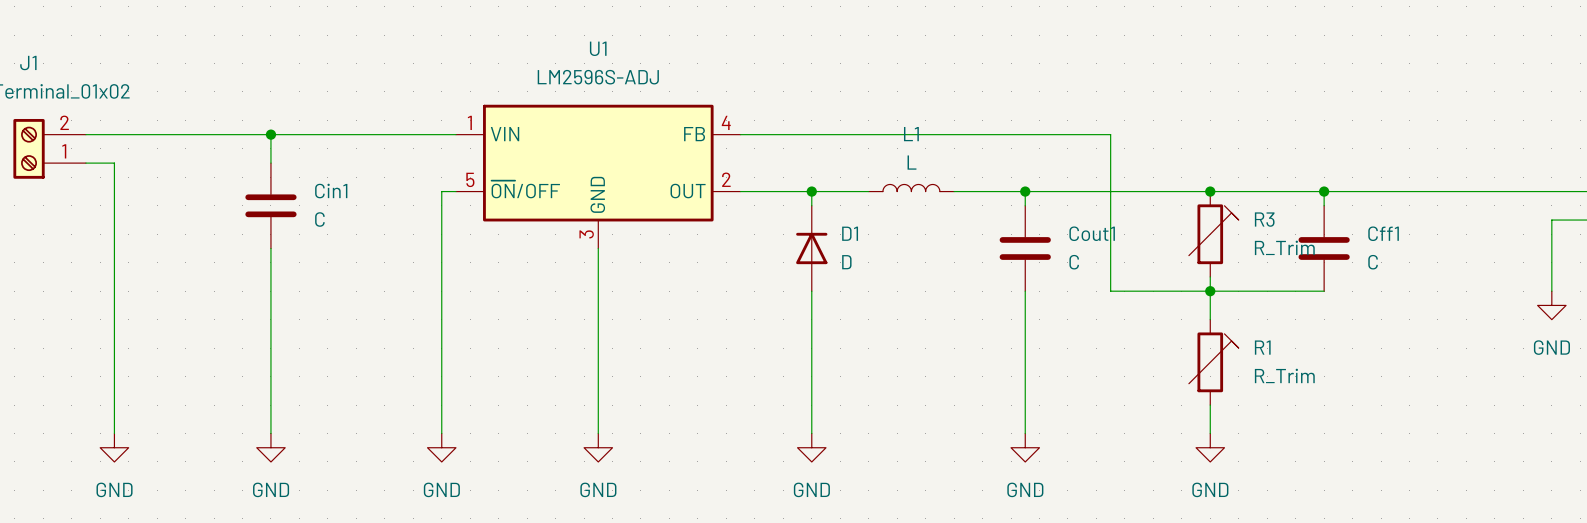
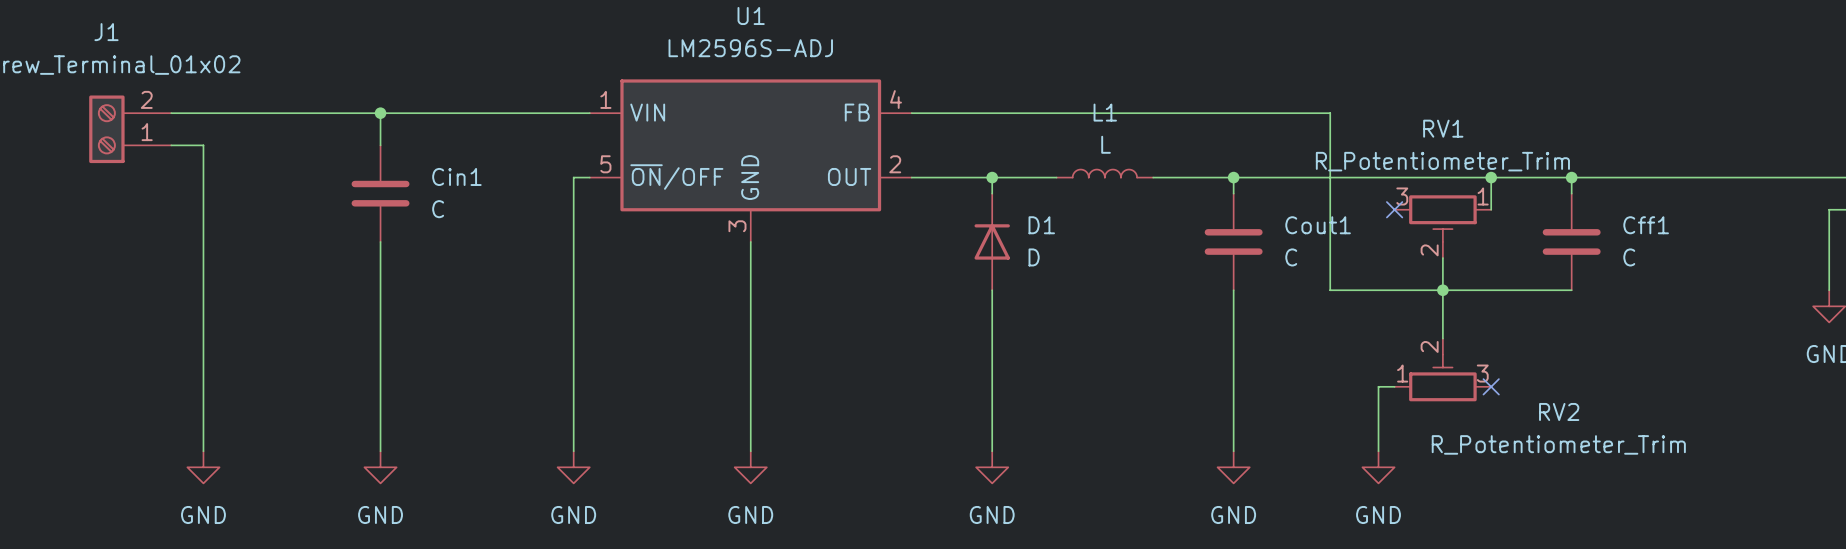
junction position: (1210, 191) -> (1491, 177)
no-connect mark: none -> (1394, 209)
RV1: none -> R_Potentiometer_Trim (1442, 226)
R3: R_Trim (1213, 234) -> none
RV2: none -> R_Potentiometer_Trim (1442, 369)
R1: R_Trim (1213, 362) -> none
wire: none -> (1394, 386) (1378, 386) (1378, 451)
no-connect mark: none -> (1491, 386)
wire: (1210, 405) (1210, 433) -> (1491, 177) (1491, 209)
power symbol position: GND (1210, 447) -> GND (1378, 467)

